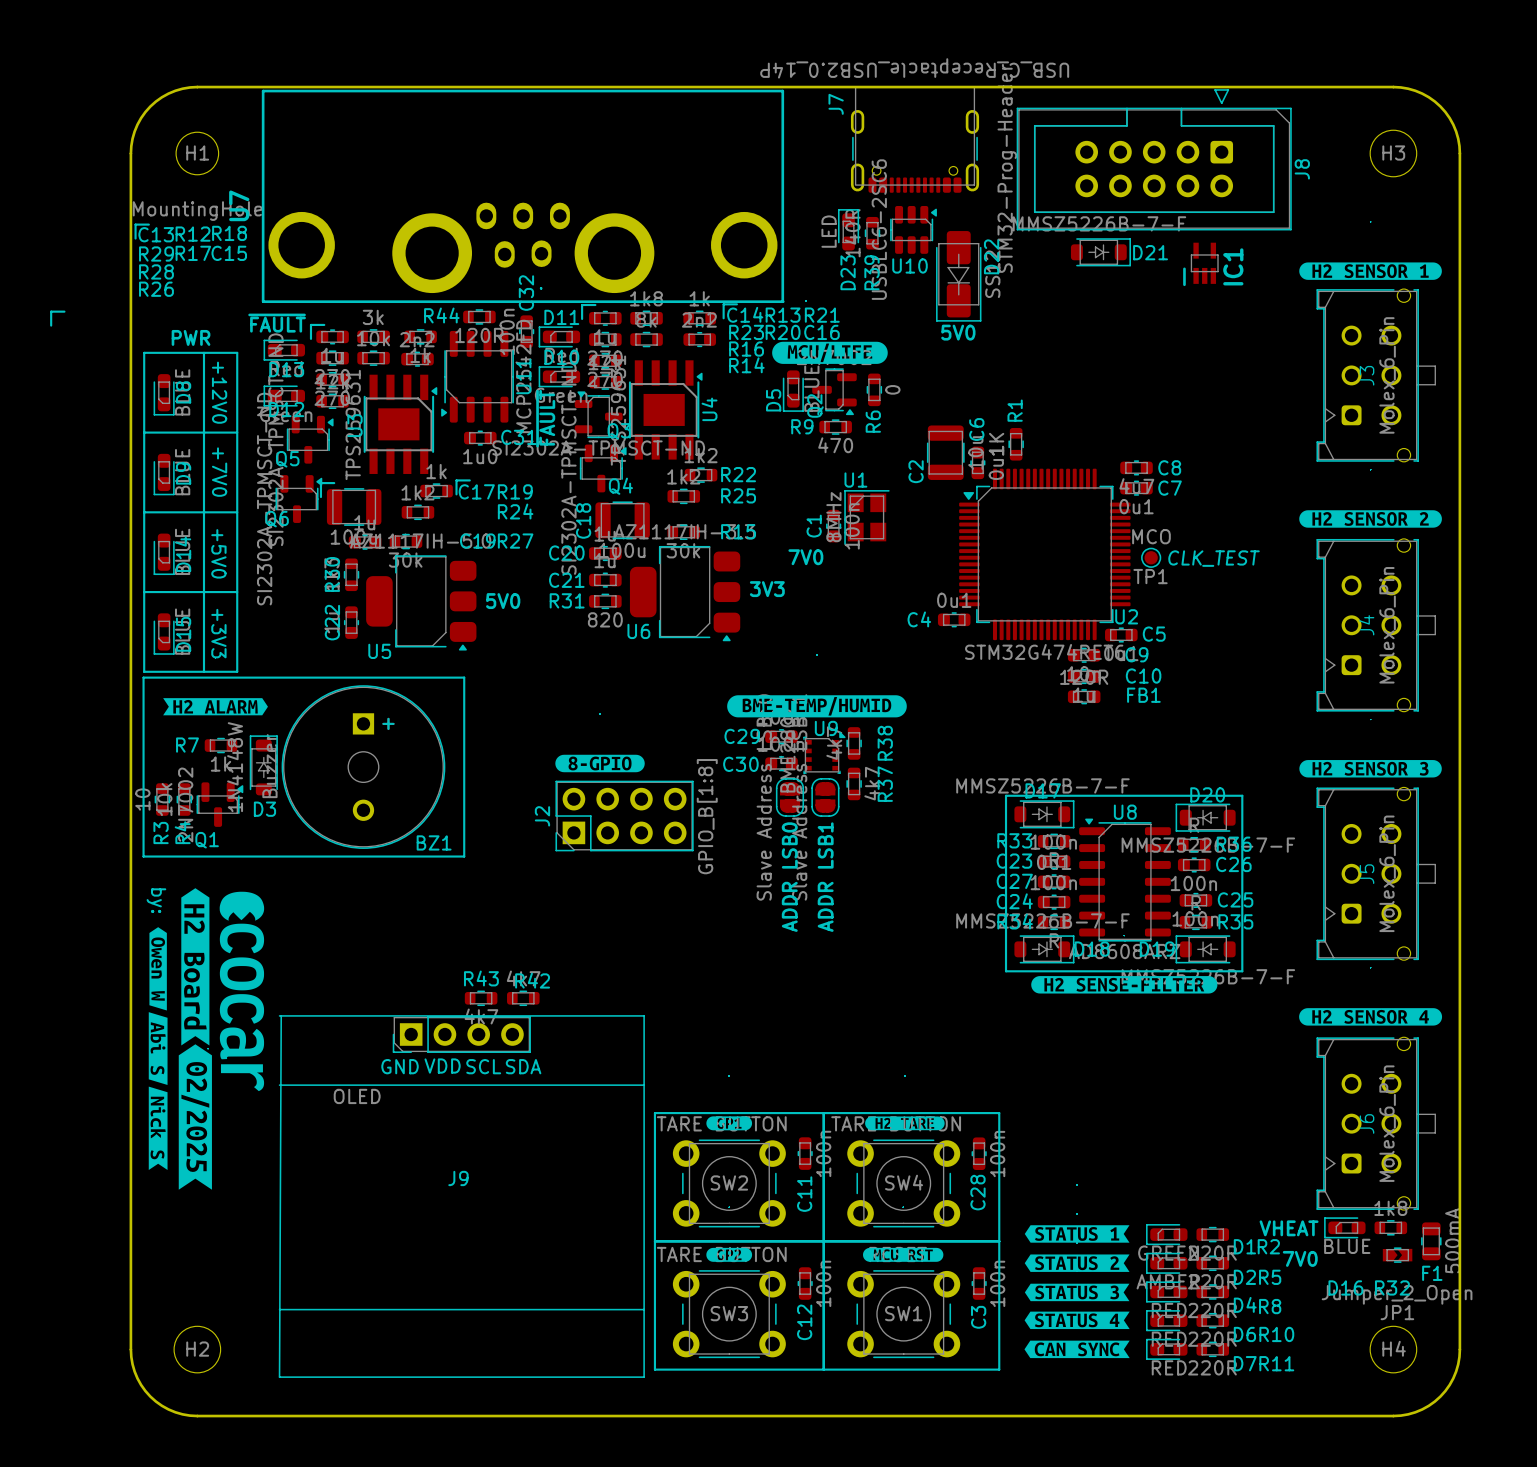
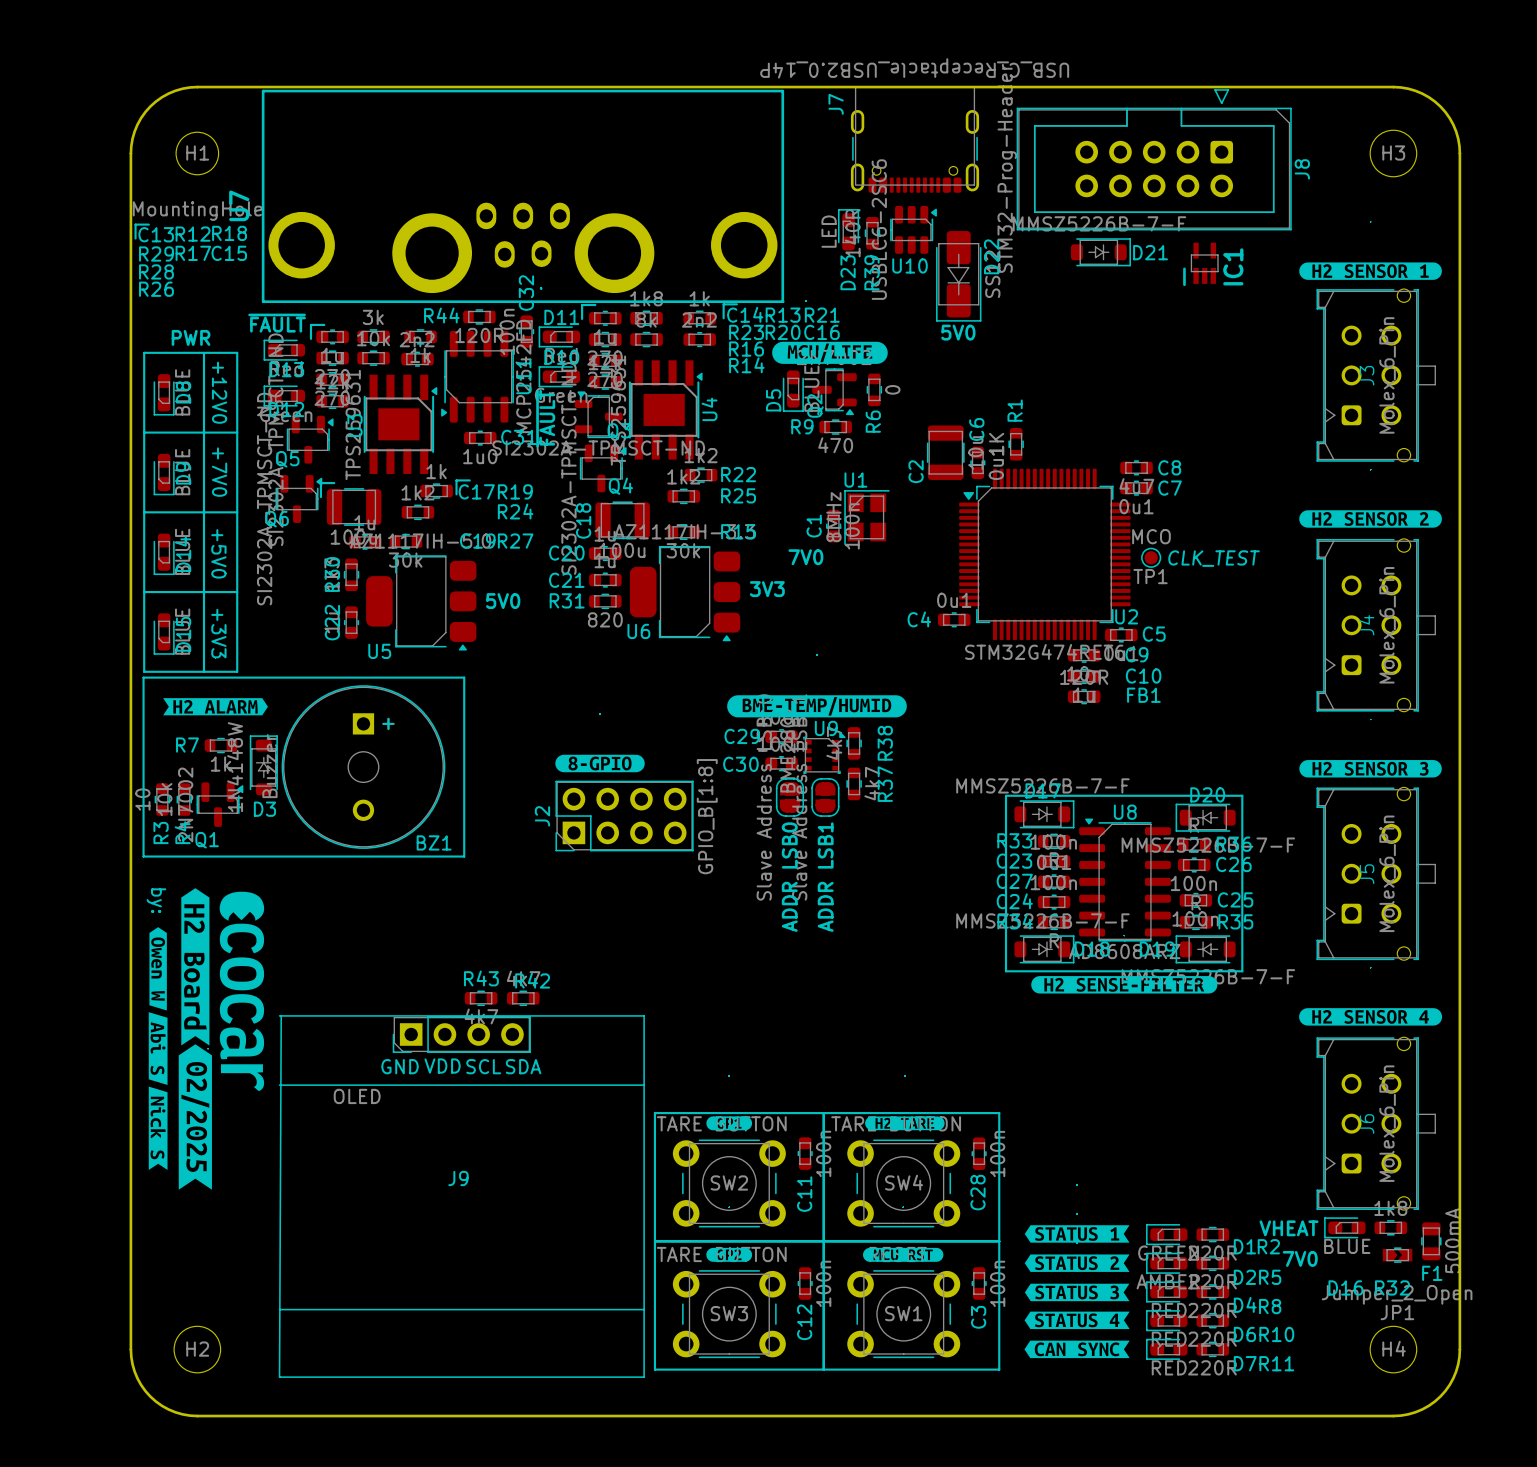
line: (64, 311) (51, 311) (51, 325) -> none

